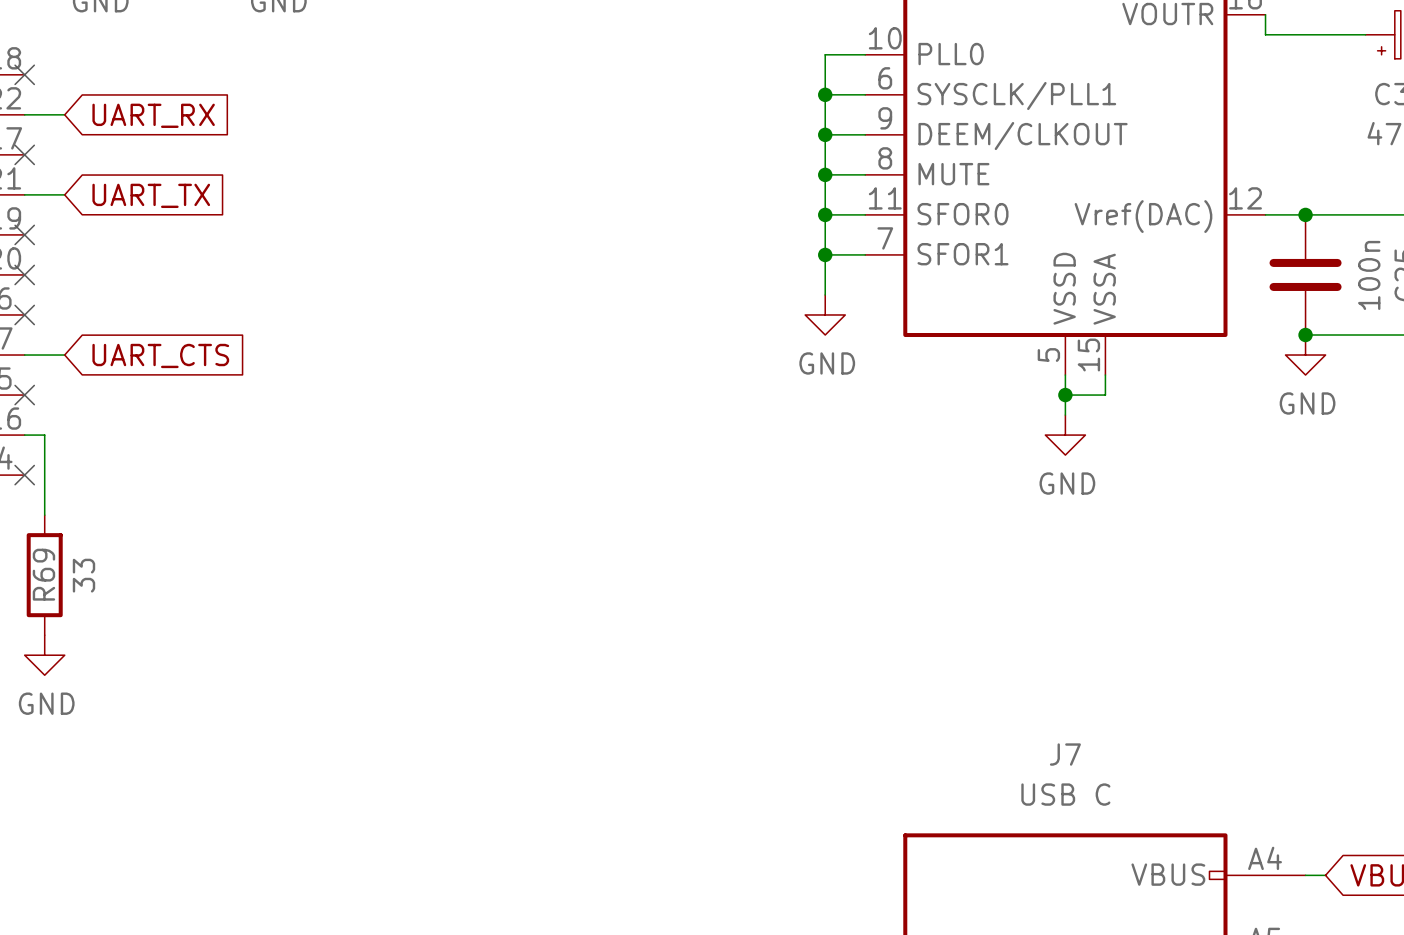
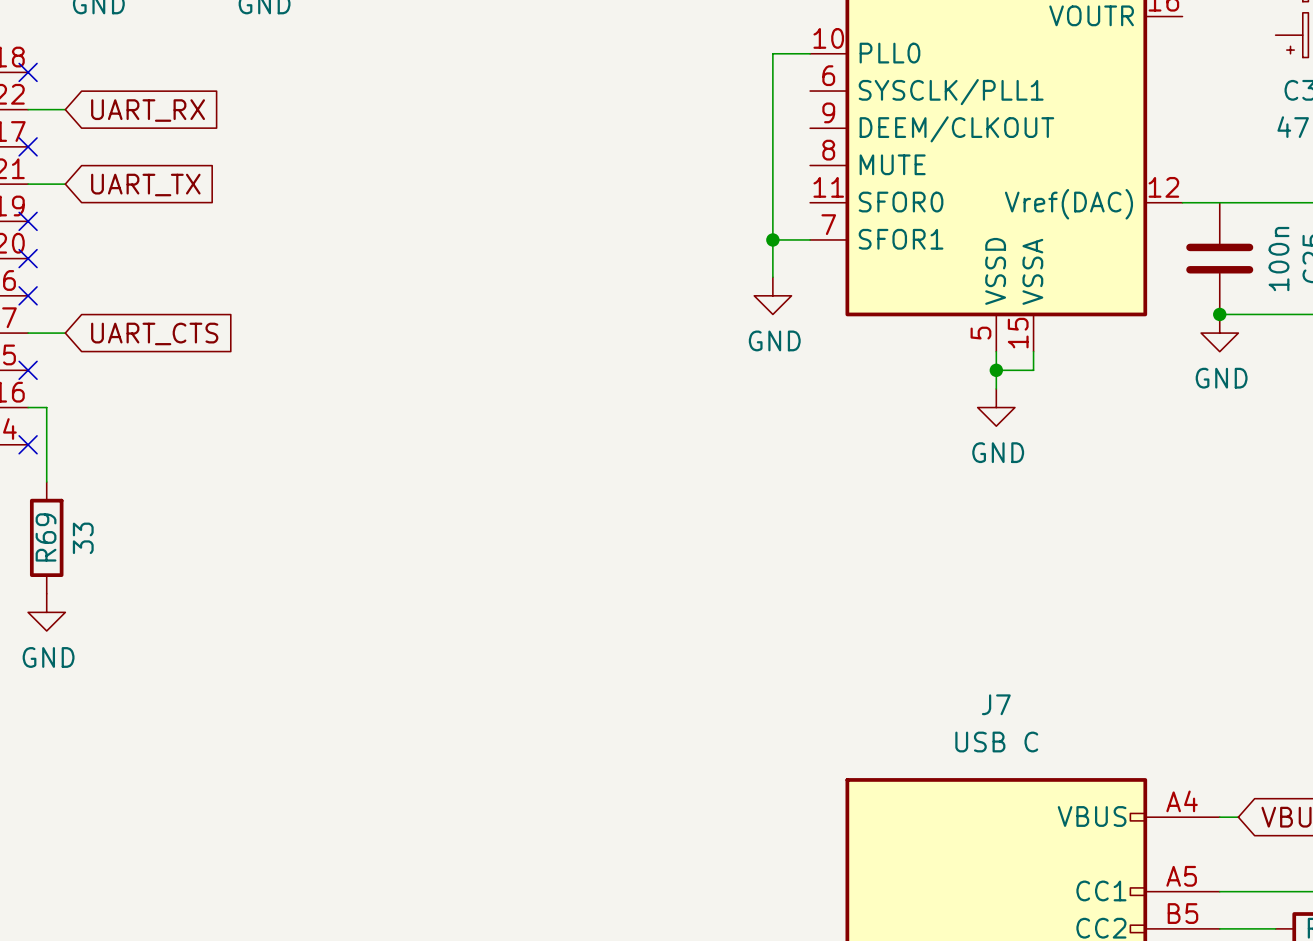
wire: (1265, 14) (1265, 34) (1365, 34) -> none
wire: (825, 94) (865, 94) -> none
junction: (825, 94) -> none
wire: (825, 134) (865, 134) -> none
junction: (825, 134) -> none
wire: (825, 174) (865, 174) -> none
junction: (825, 174) -> none
wire: (825, 214) (865, 214) -> none
junction: (825, 214) -> none
junction: (1305, 214) -> none

